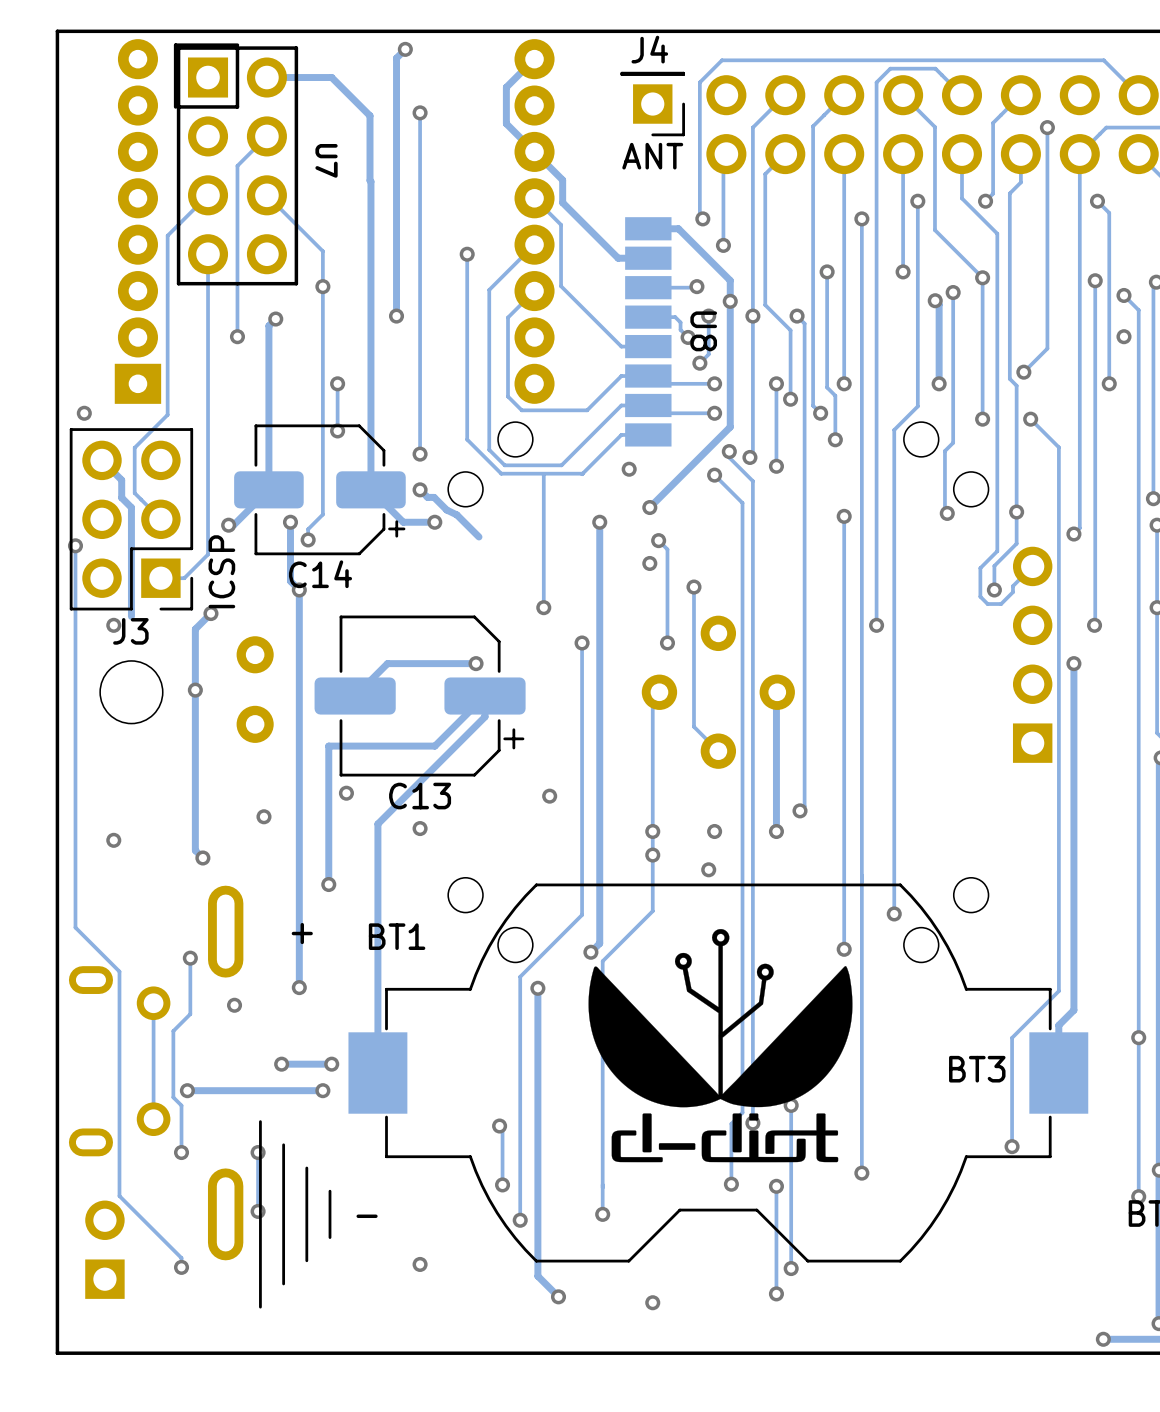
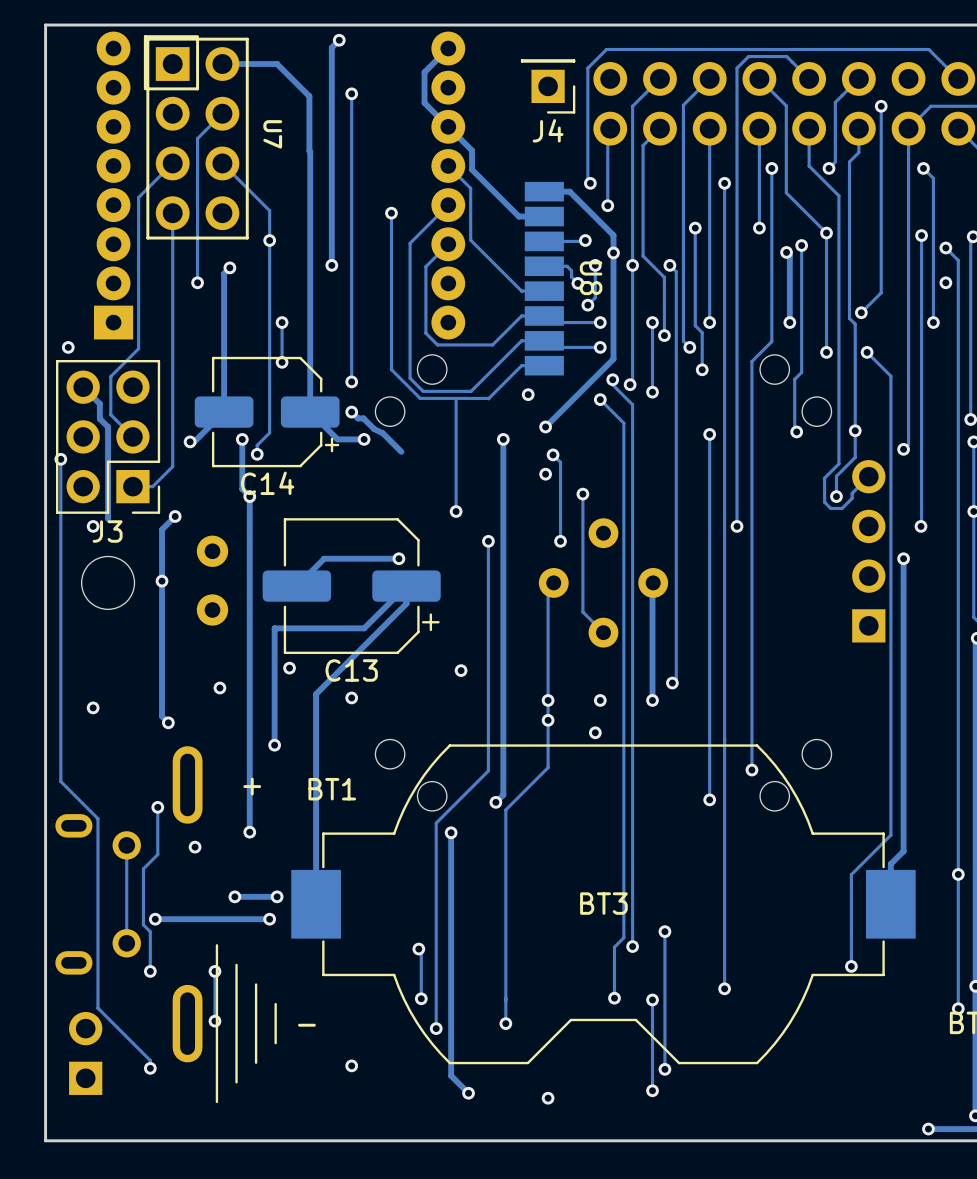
J4 name position: J4 (649, 49) -> J4 (548, 130)
text: ANT (652, 156) -> none
text: ICSP (221, 571) -> none
drawing: [588, 929, 853, 1163] -> none
BT3 name position: BT3 (977, 1069) -> BT3 (603, 903)

